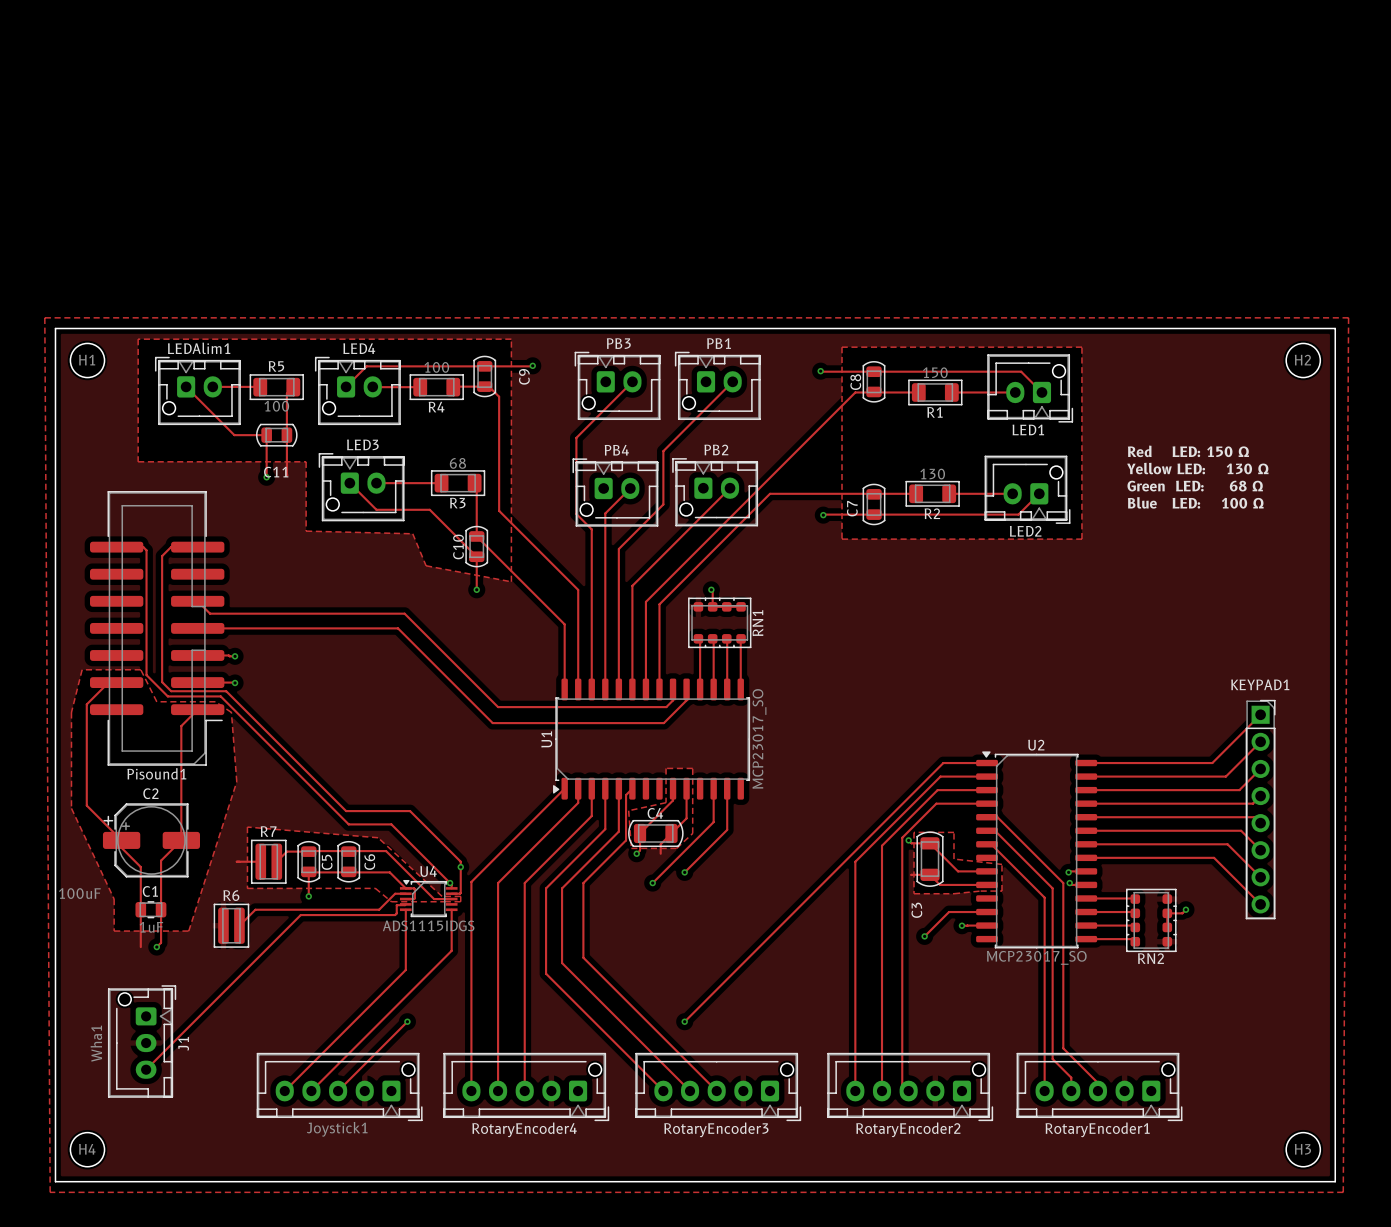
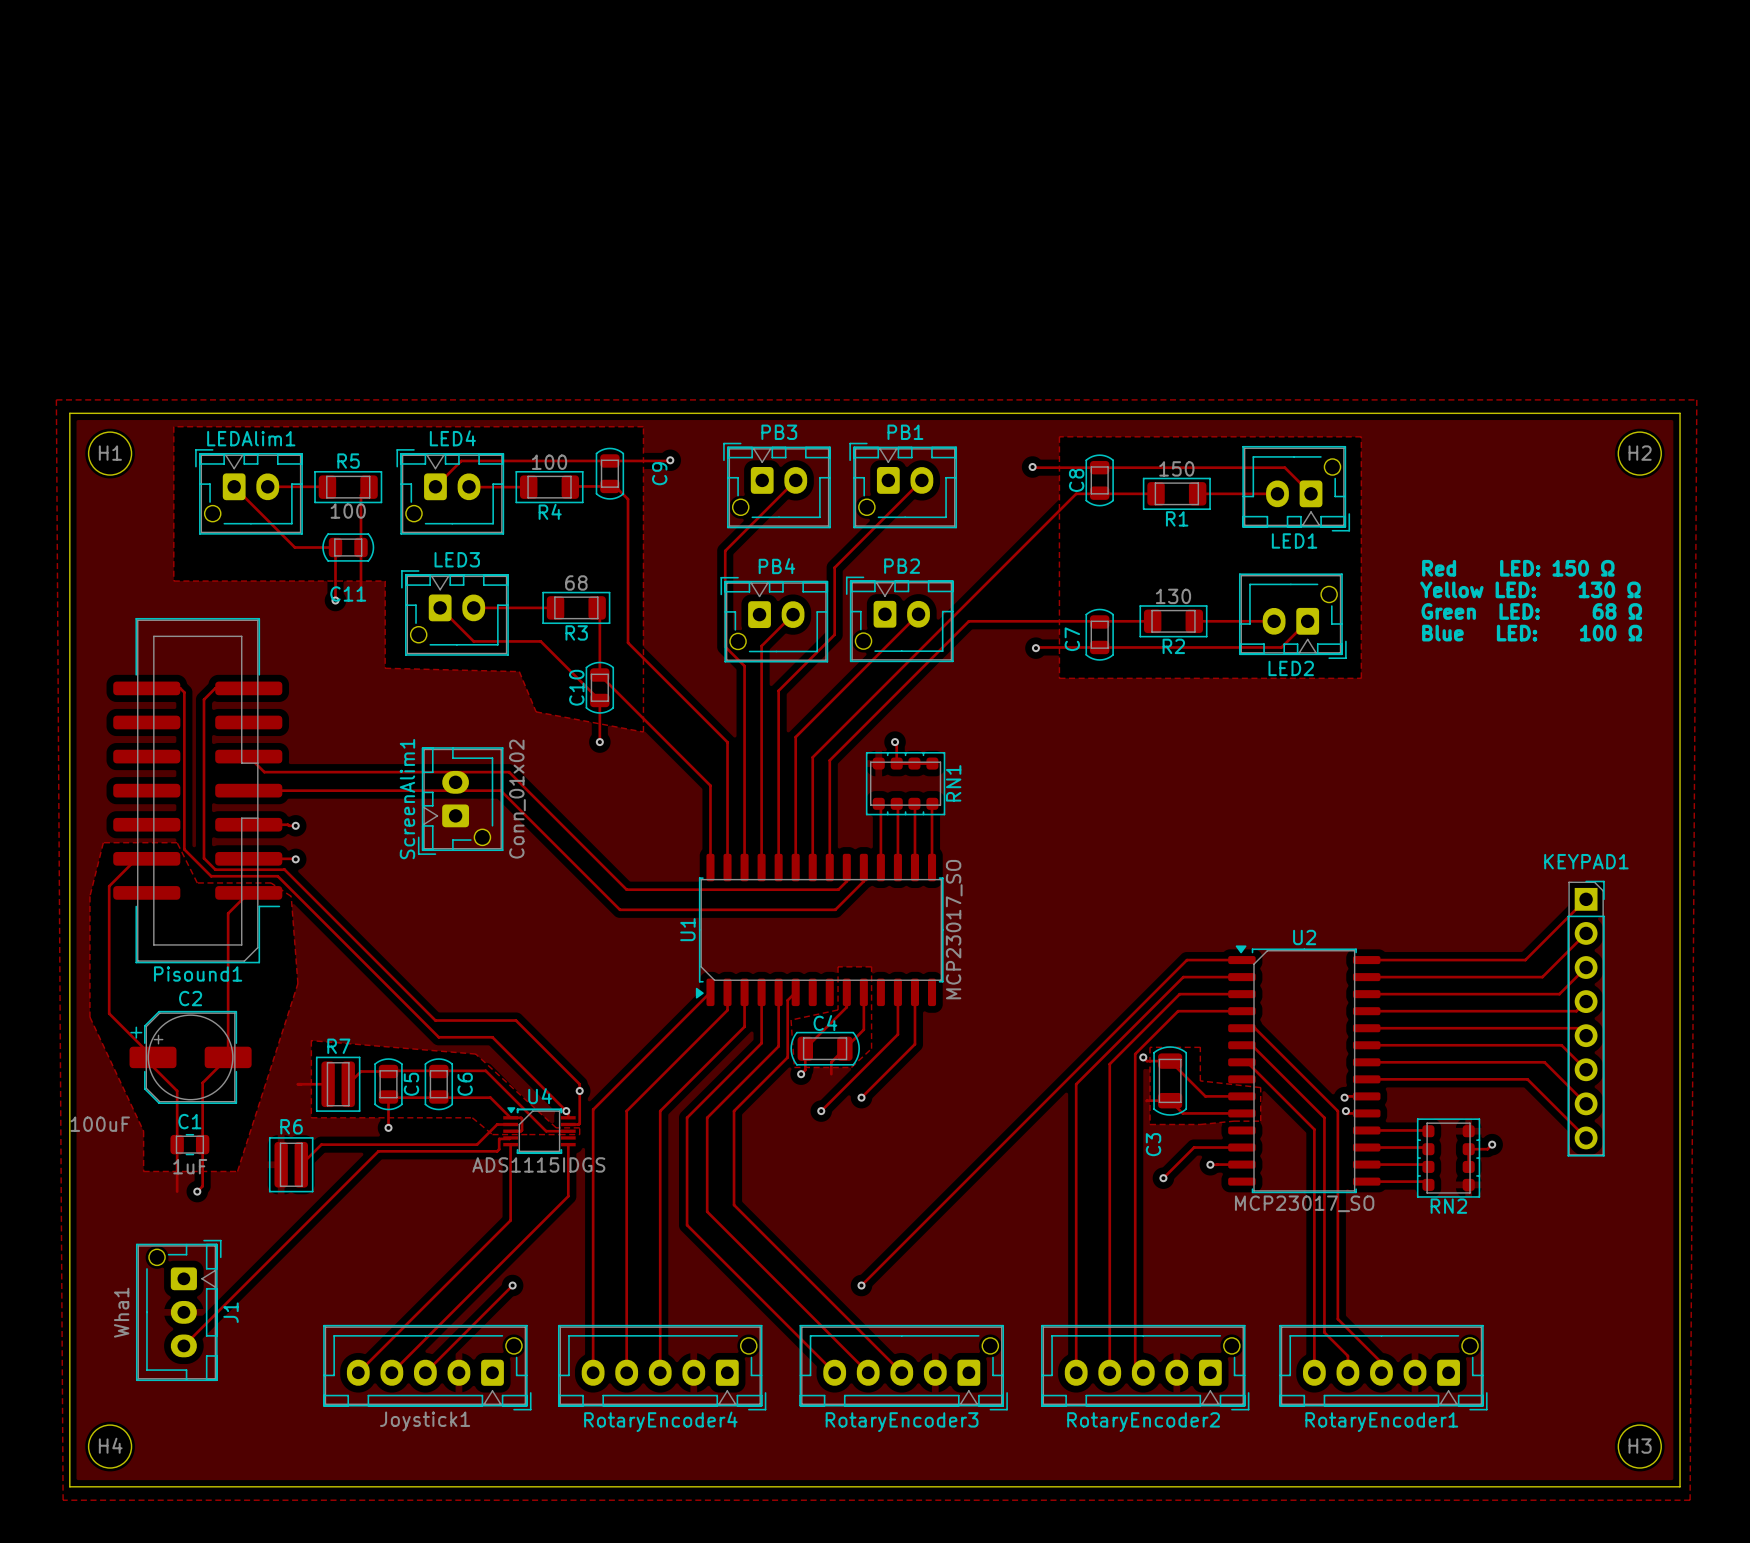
ScreenAlim1: none -> Conn_01x02 (460, 801)

